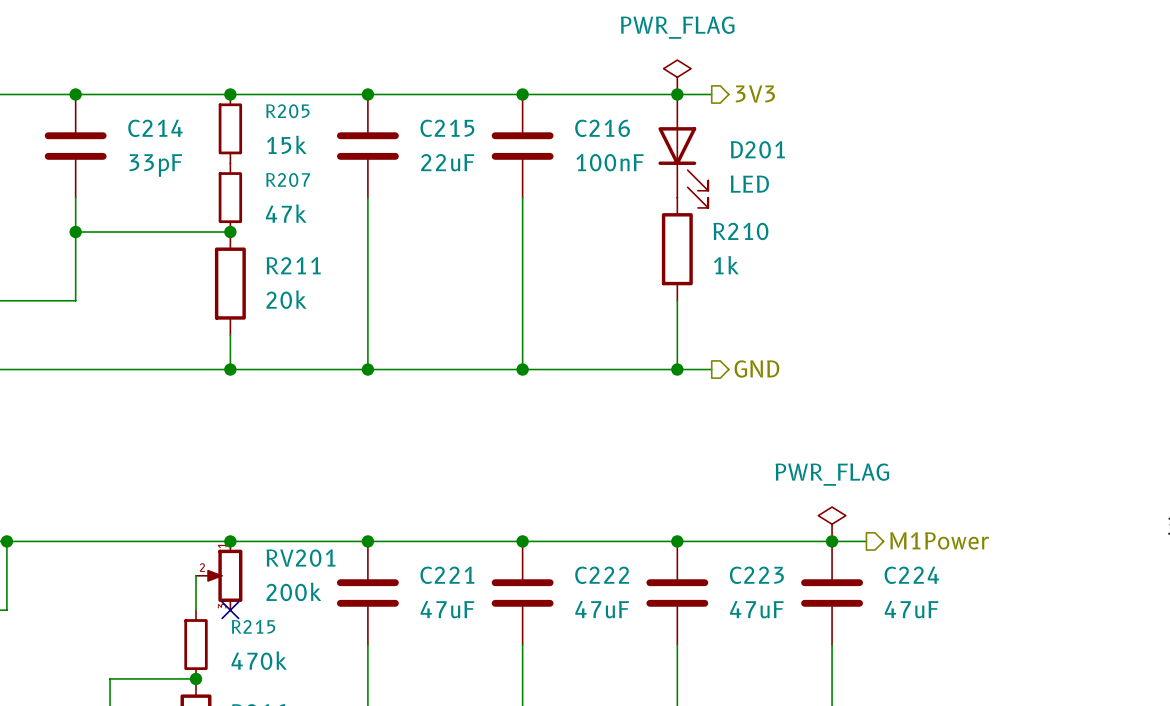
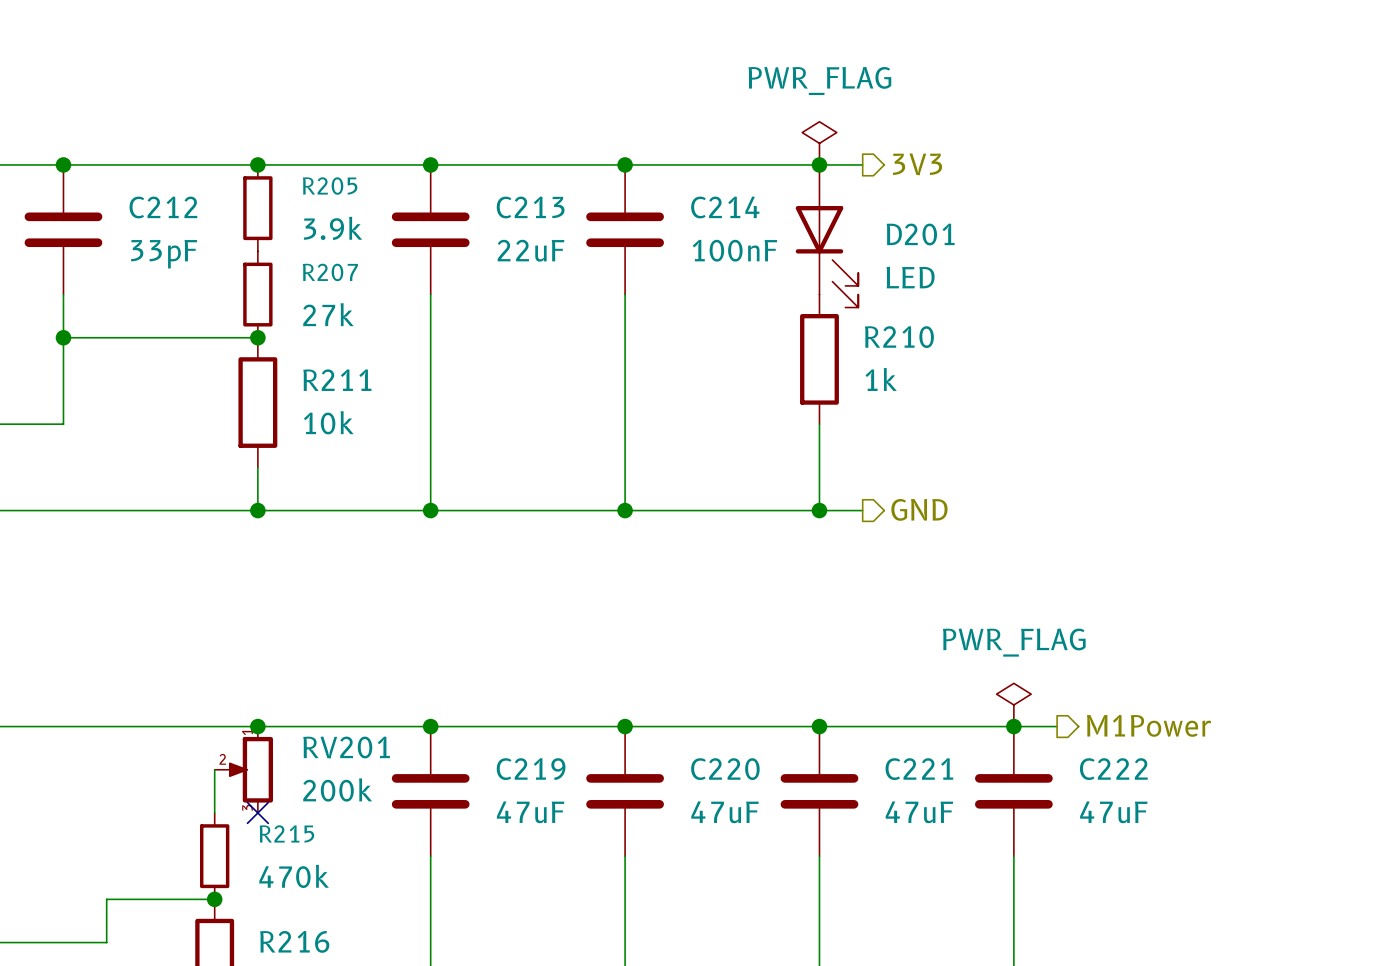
C214 name: C214 (155, 128) -> C212 (163, 207)
C215 name: C215 (447, 128) -> C213 (530, 207)
C216 name: C216 (602, 128) -> C214 (725, 207)
R205 value: 15k (286, 144) -> 3.9k (333, 228)
R207 value: 47k (286, 213) -> 27k (328, 314)
R211 value: 20k (286, 299) -> 10k (328, 422)
C221 name: C221 (447, 575) -> C219 (531, 769)
C222 name: C222 (602, 575) -> C220 (725, 769)
C223 name: C223 (756, 575) -> C221 (919, 769)
C224 name: C224 (911, 575) -> C222 (1113, 769)

